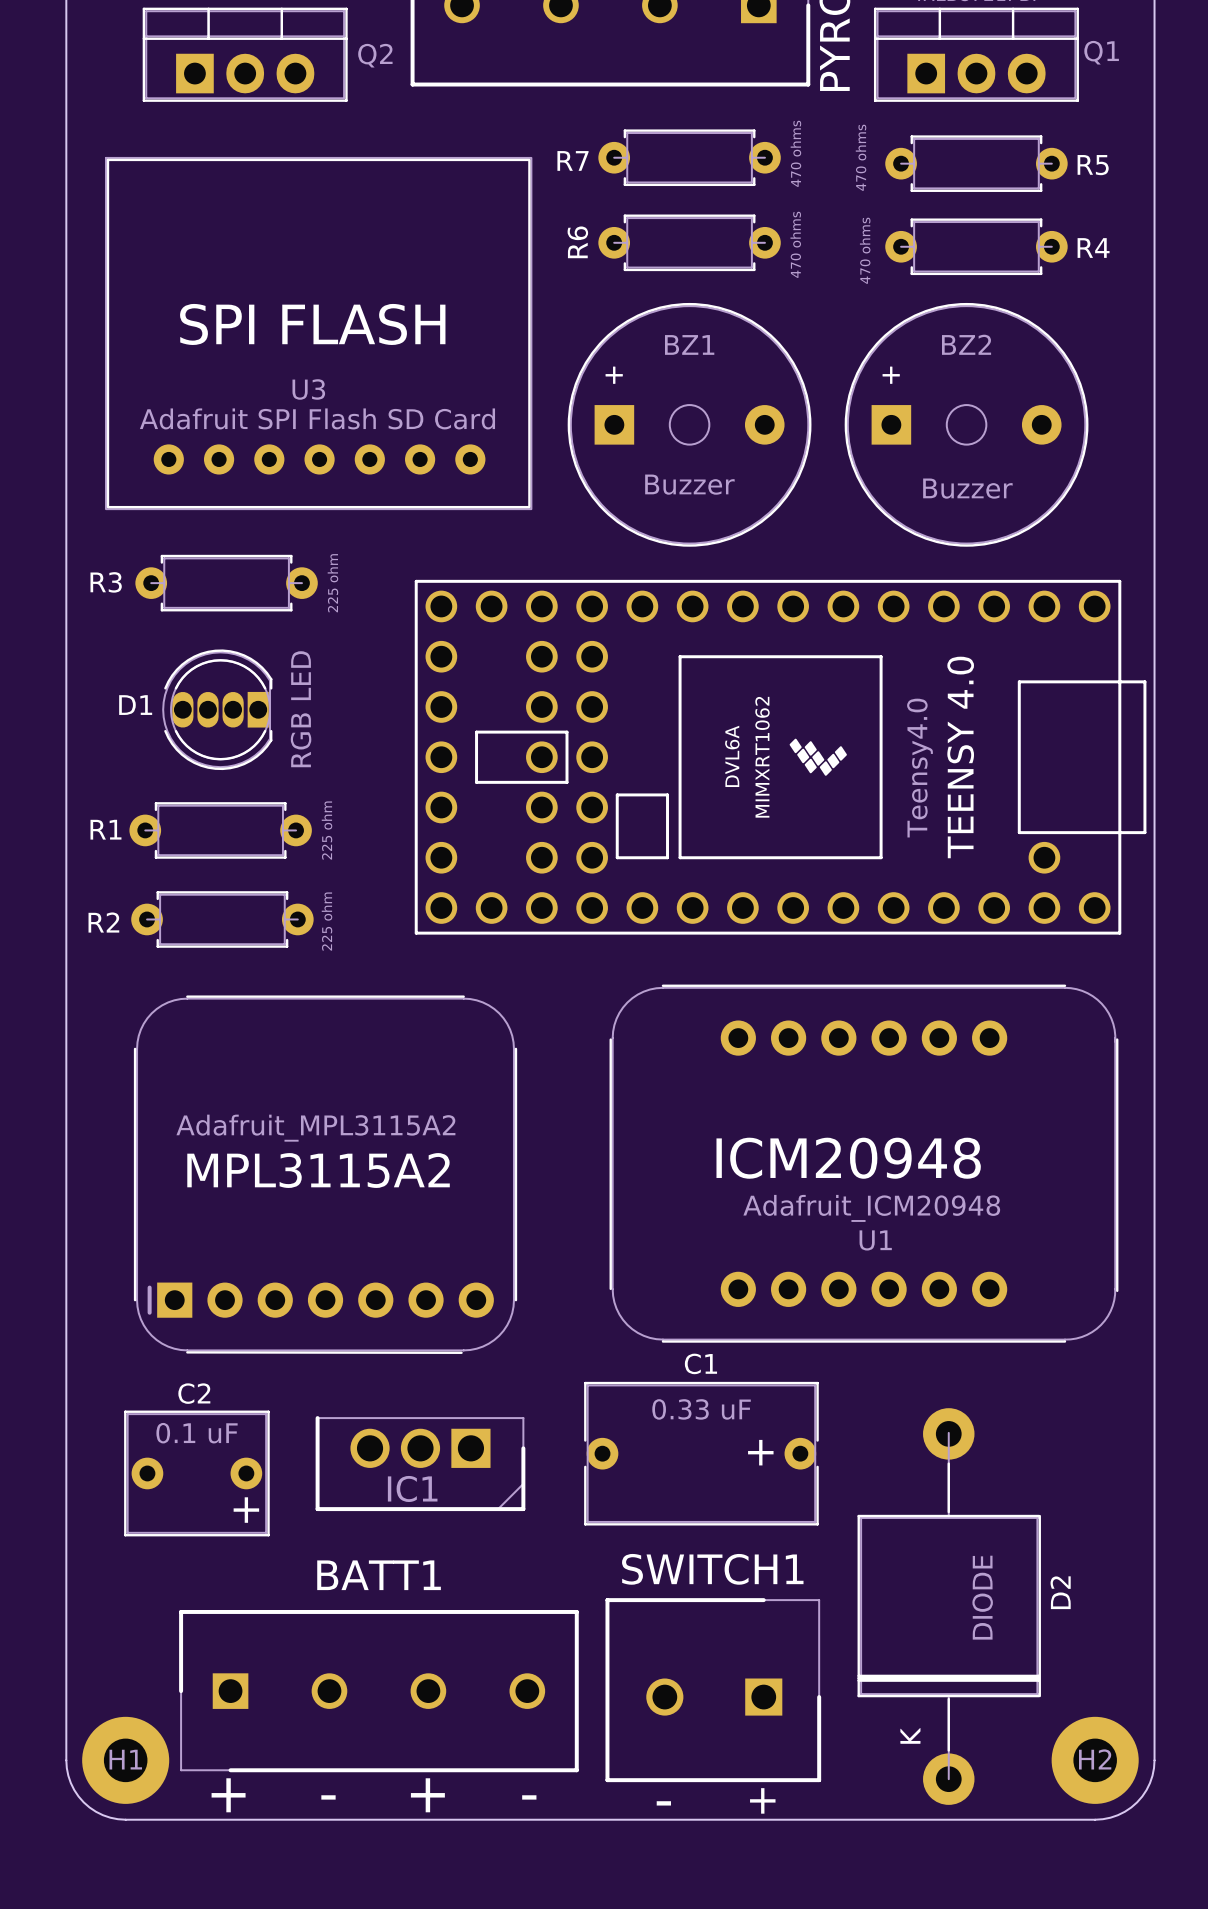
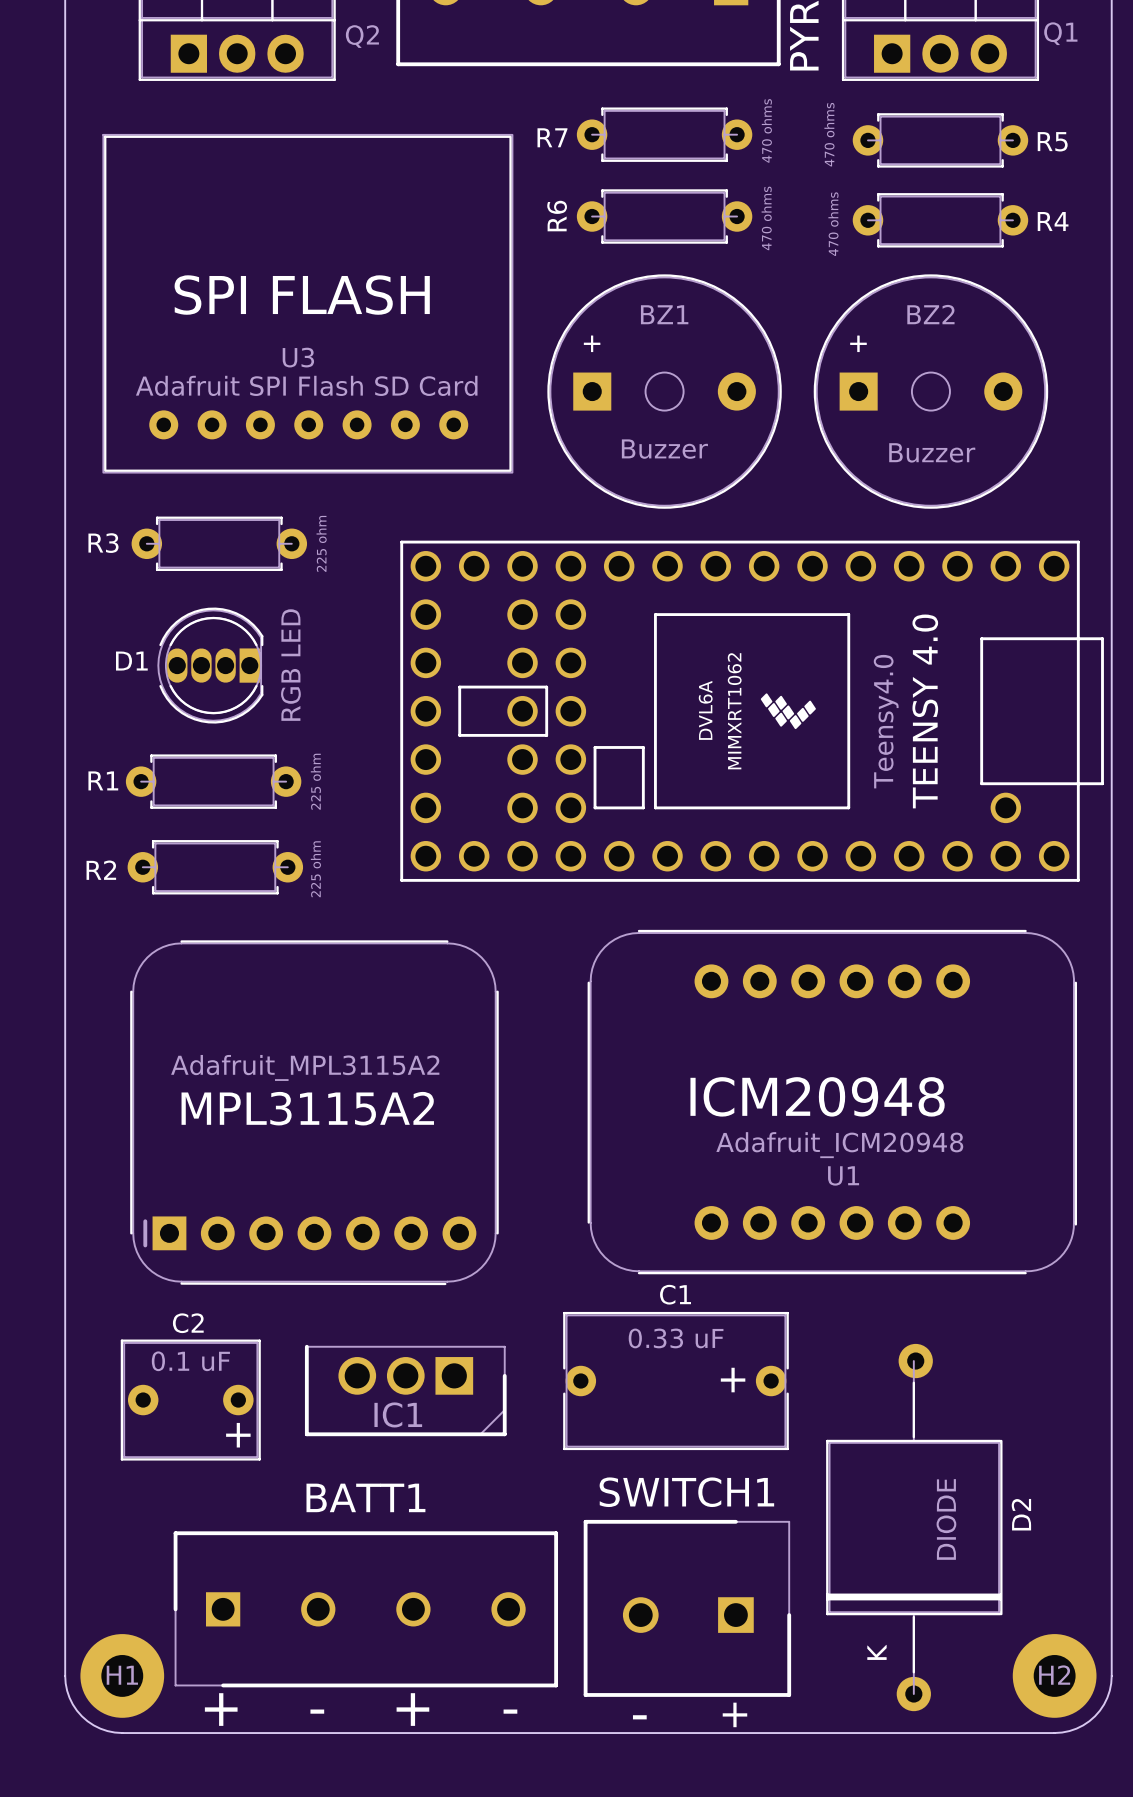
D2 footprint: [857, 1408, 1041, 1805] -> [826, 1343, 1003, 1712]

